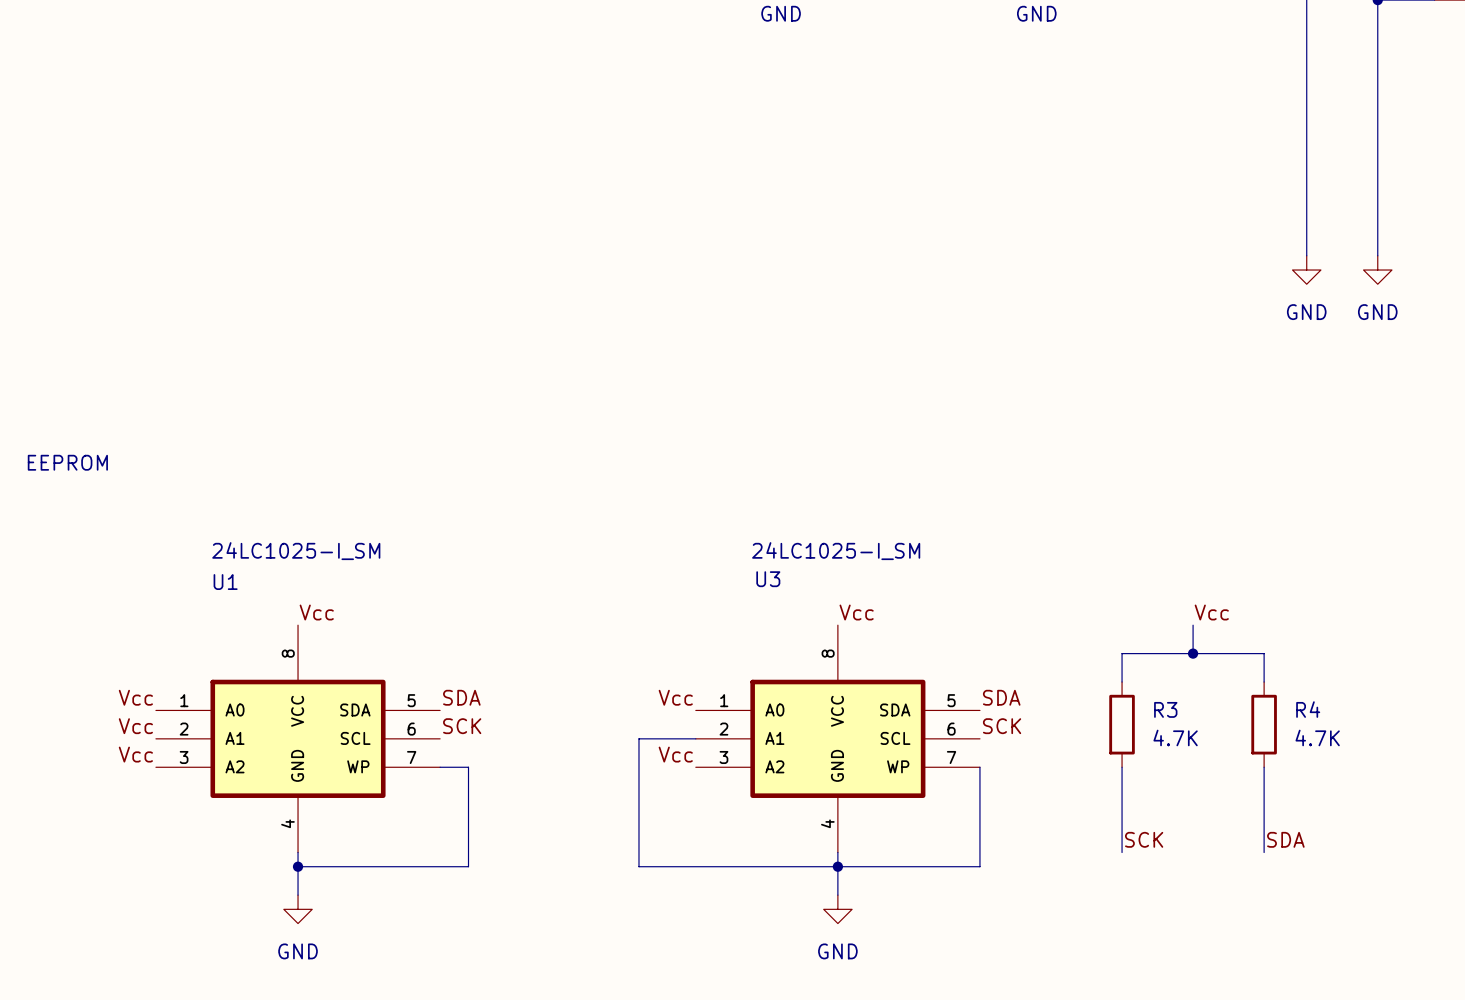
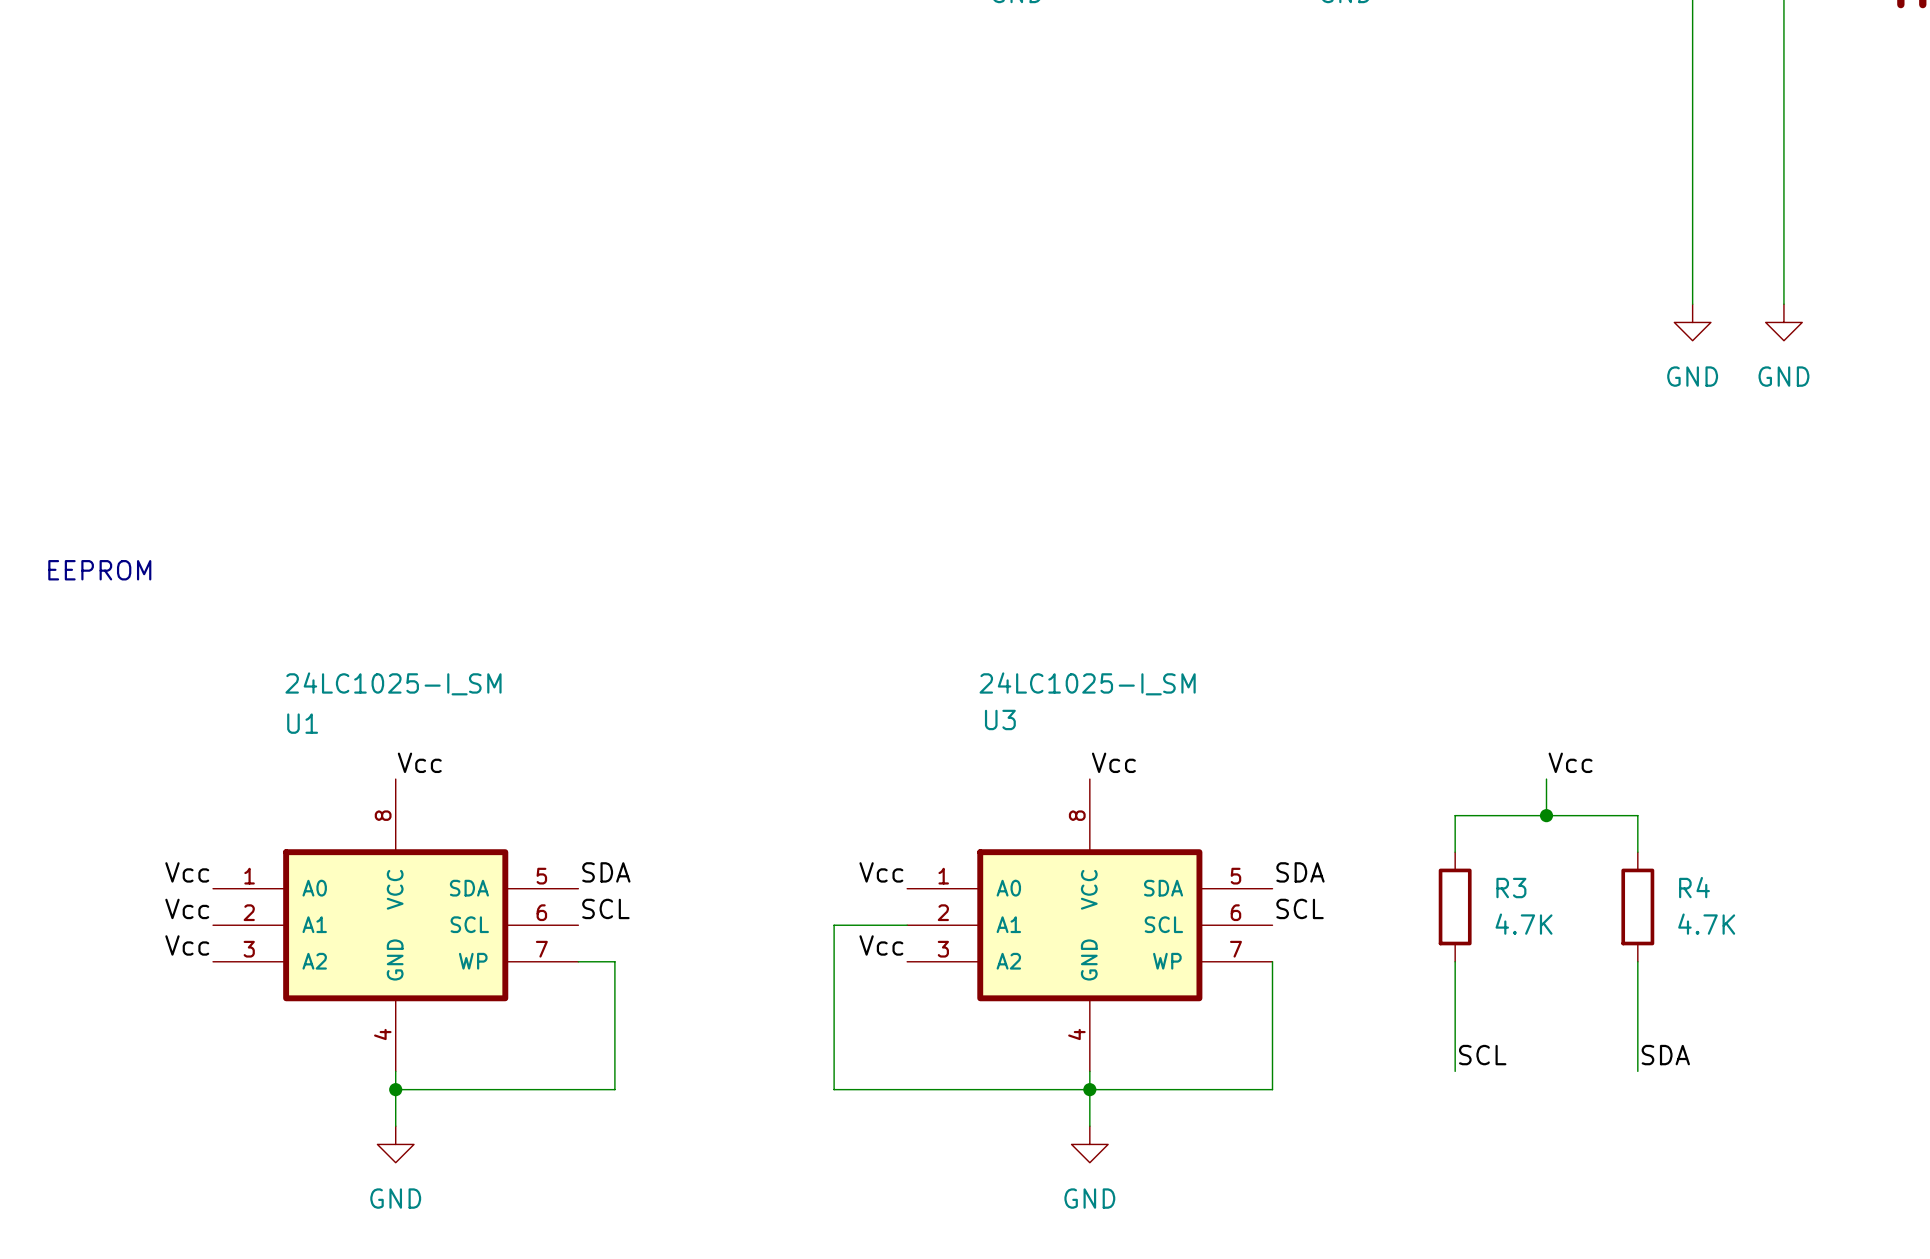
label: SCK (462, 726) -> SCL (605, 908)
label: SCK (1002, 726) -> SCL (1300, 908)
label: SCK (1144, 839) -> SCL (1482, 1055)

